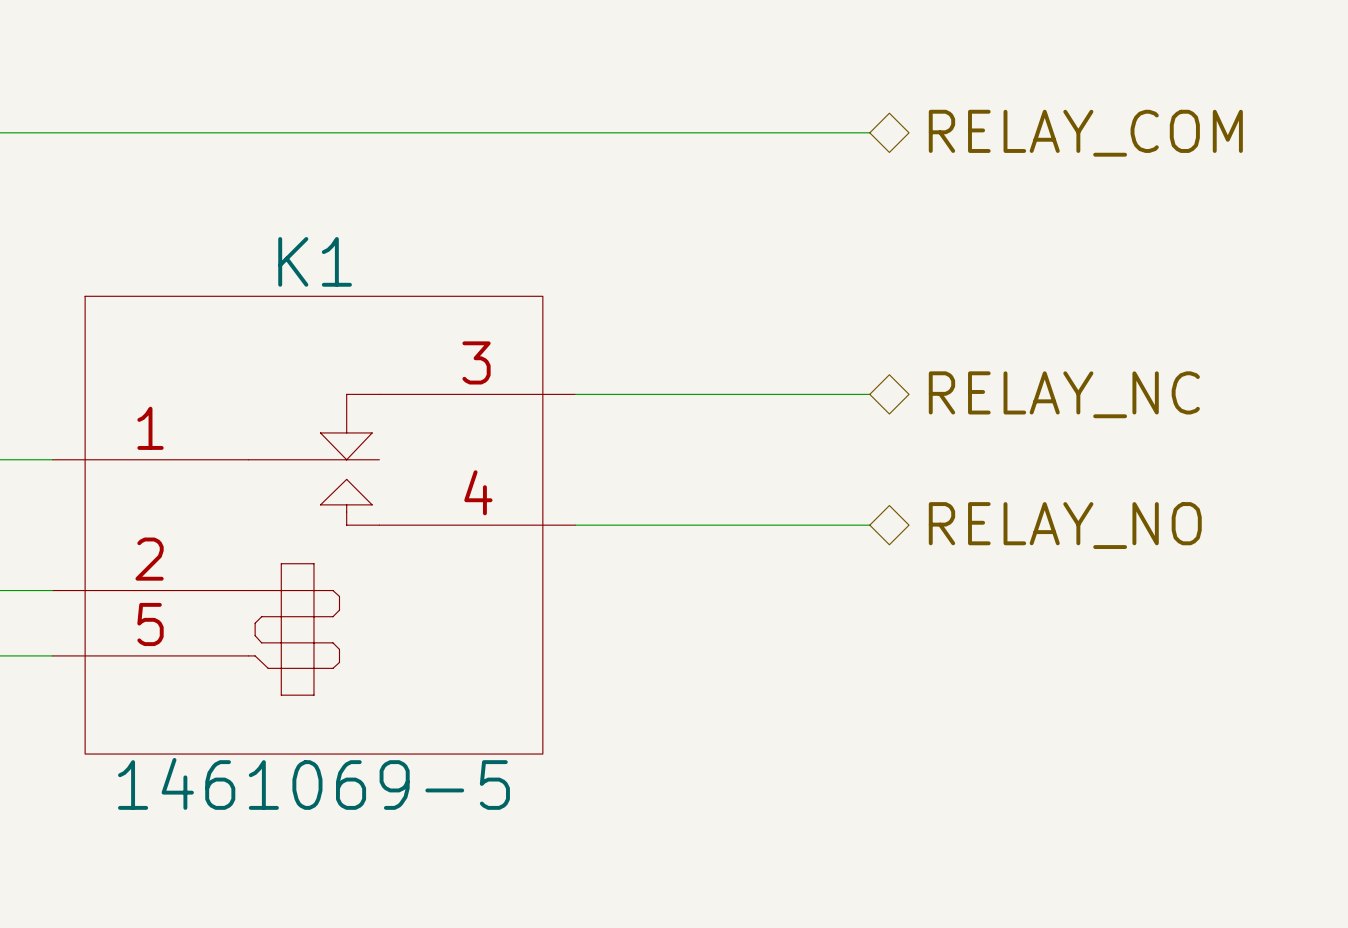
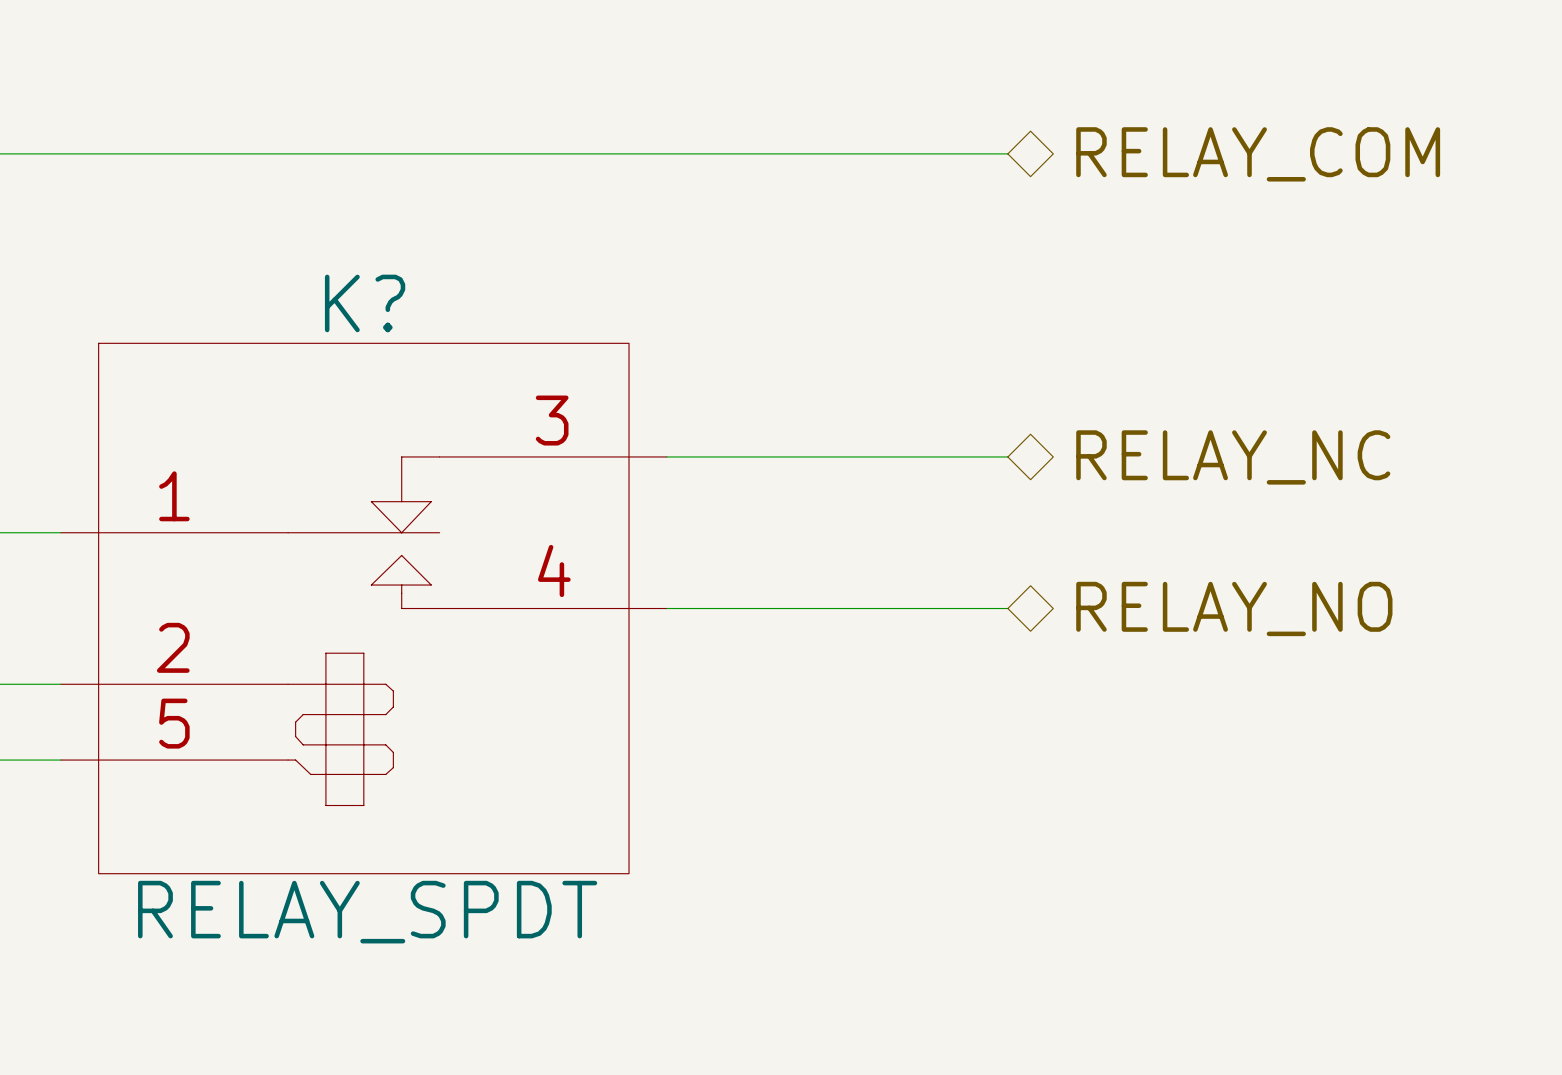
K1 name: K1 (315, 261) -> K? (365, 303)
K1 value: 1461069-5 (313, 783) -> RELAY_SPDT (367, 912)

